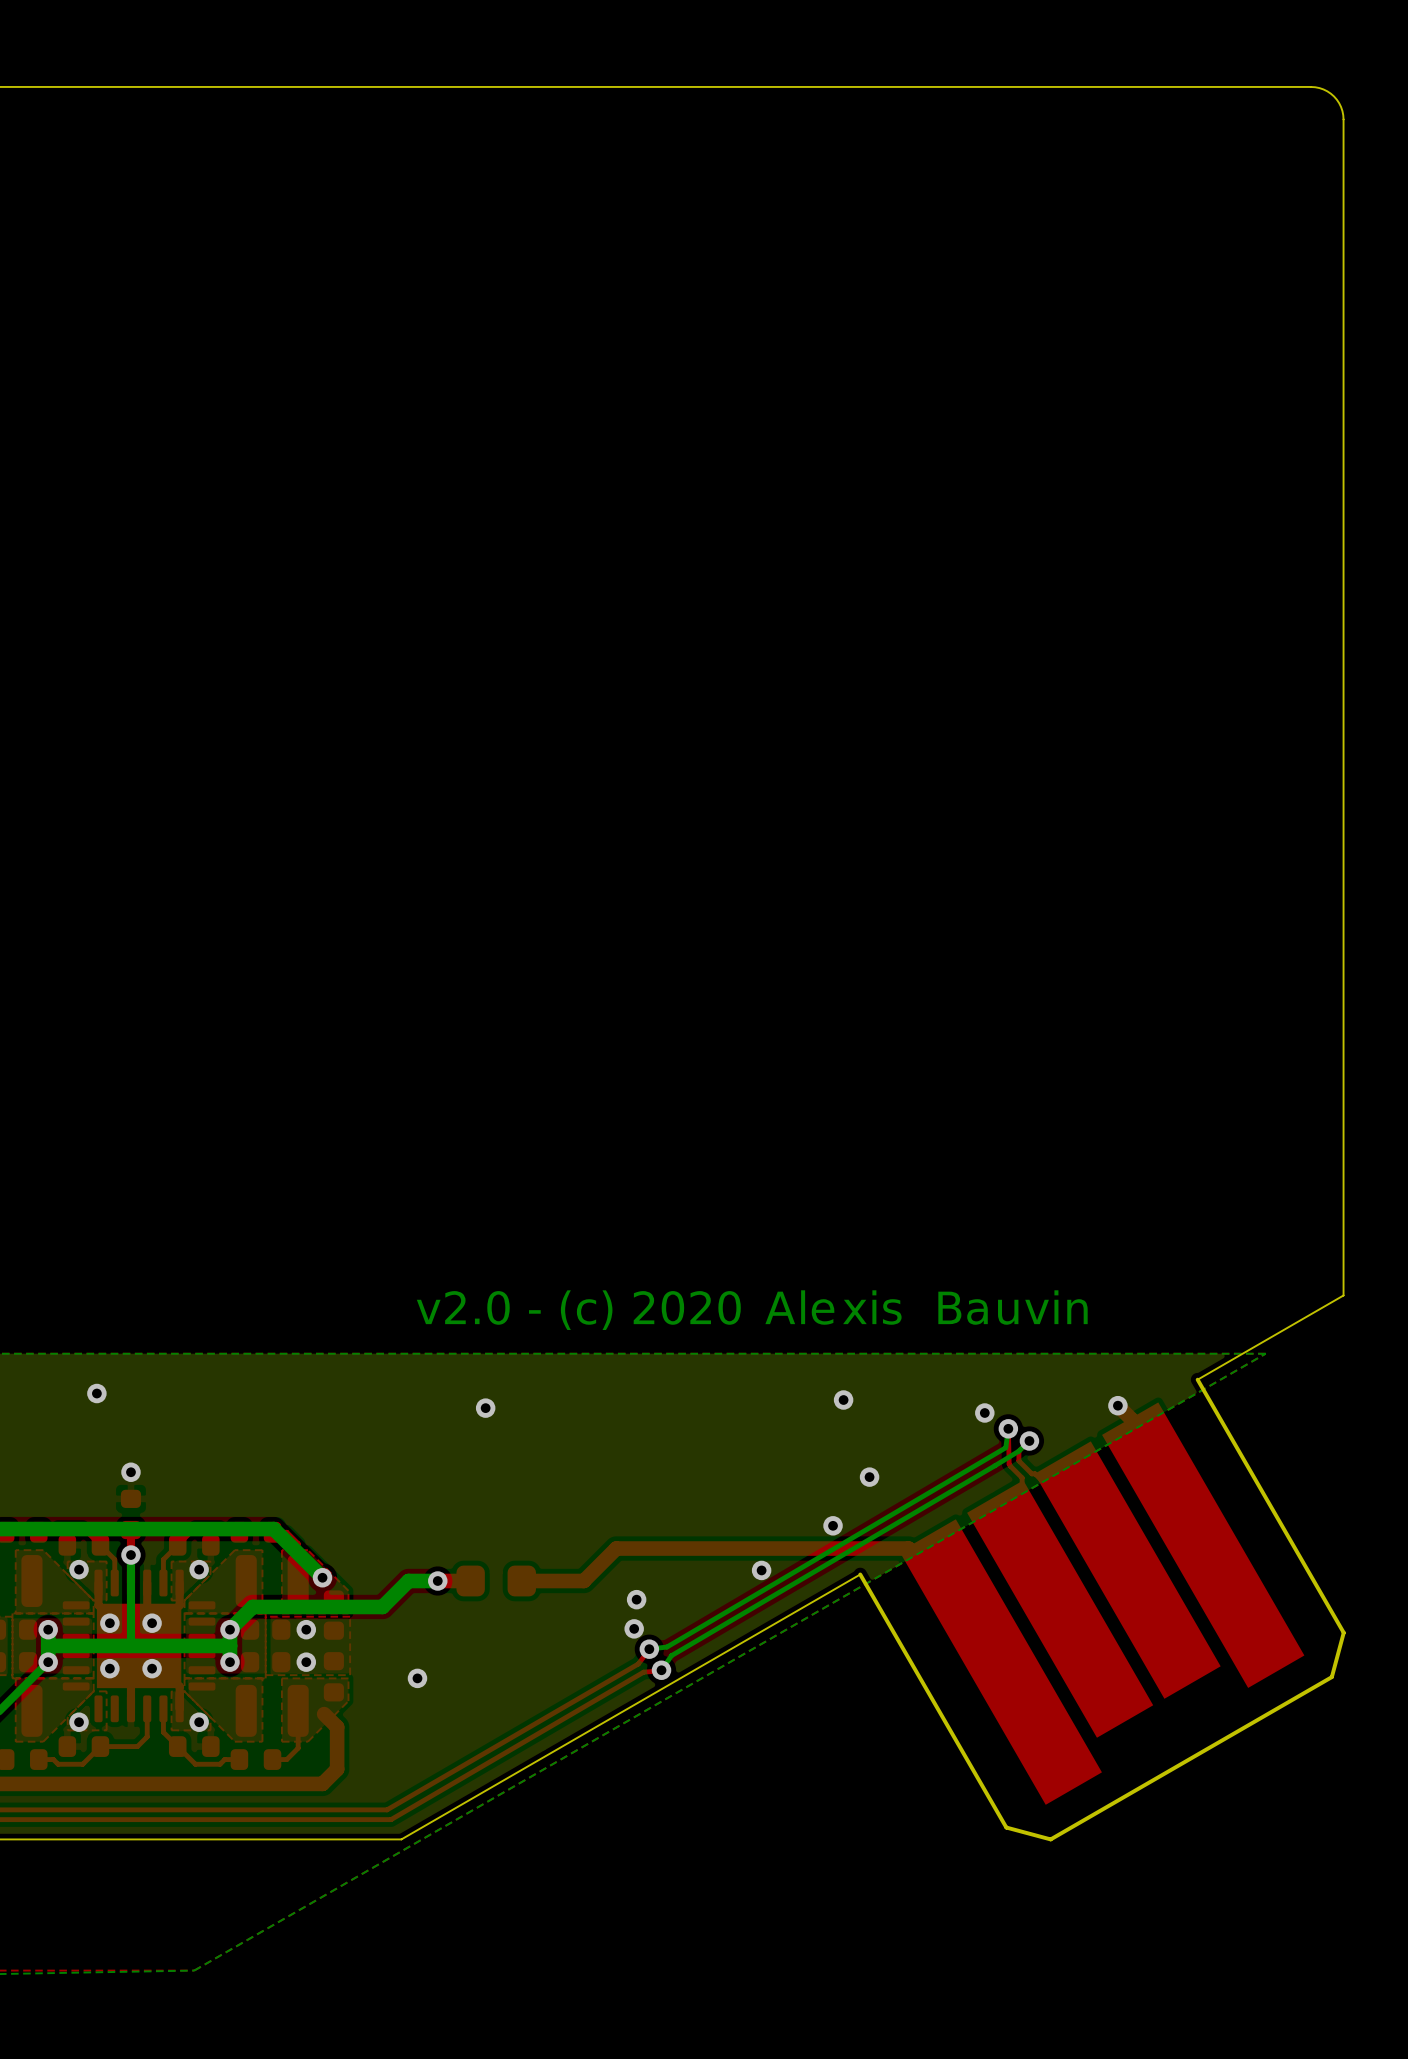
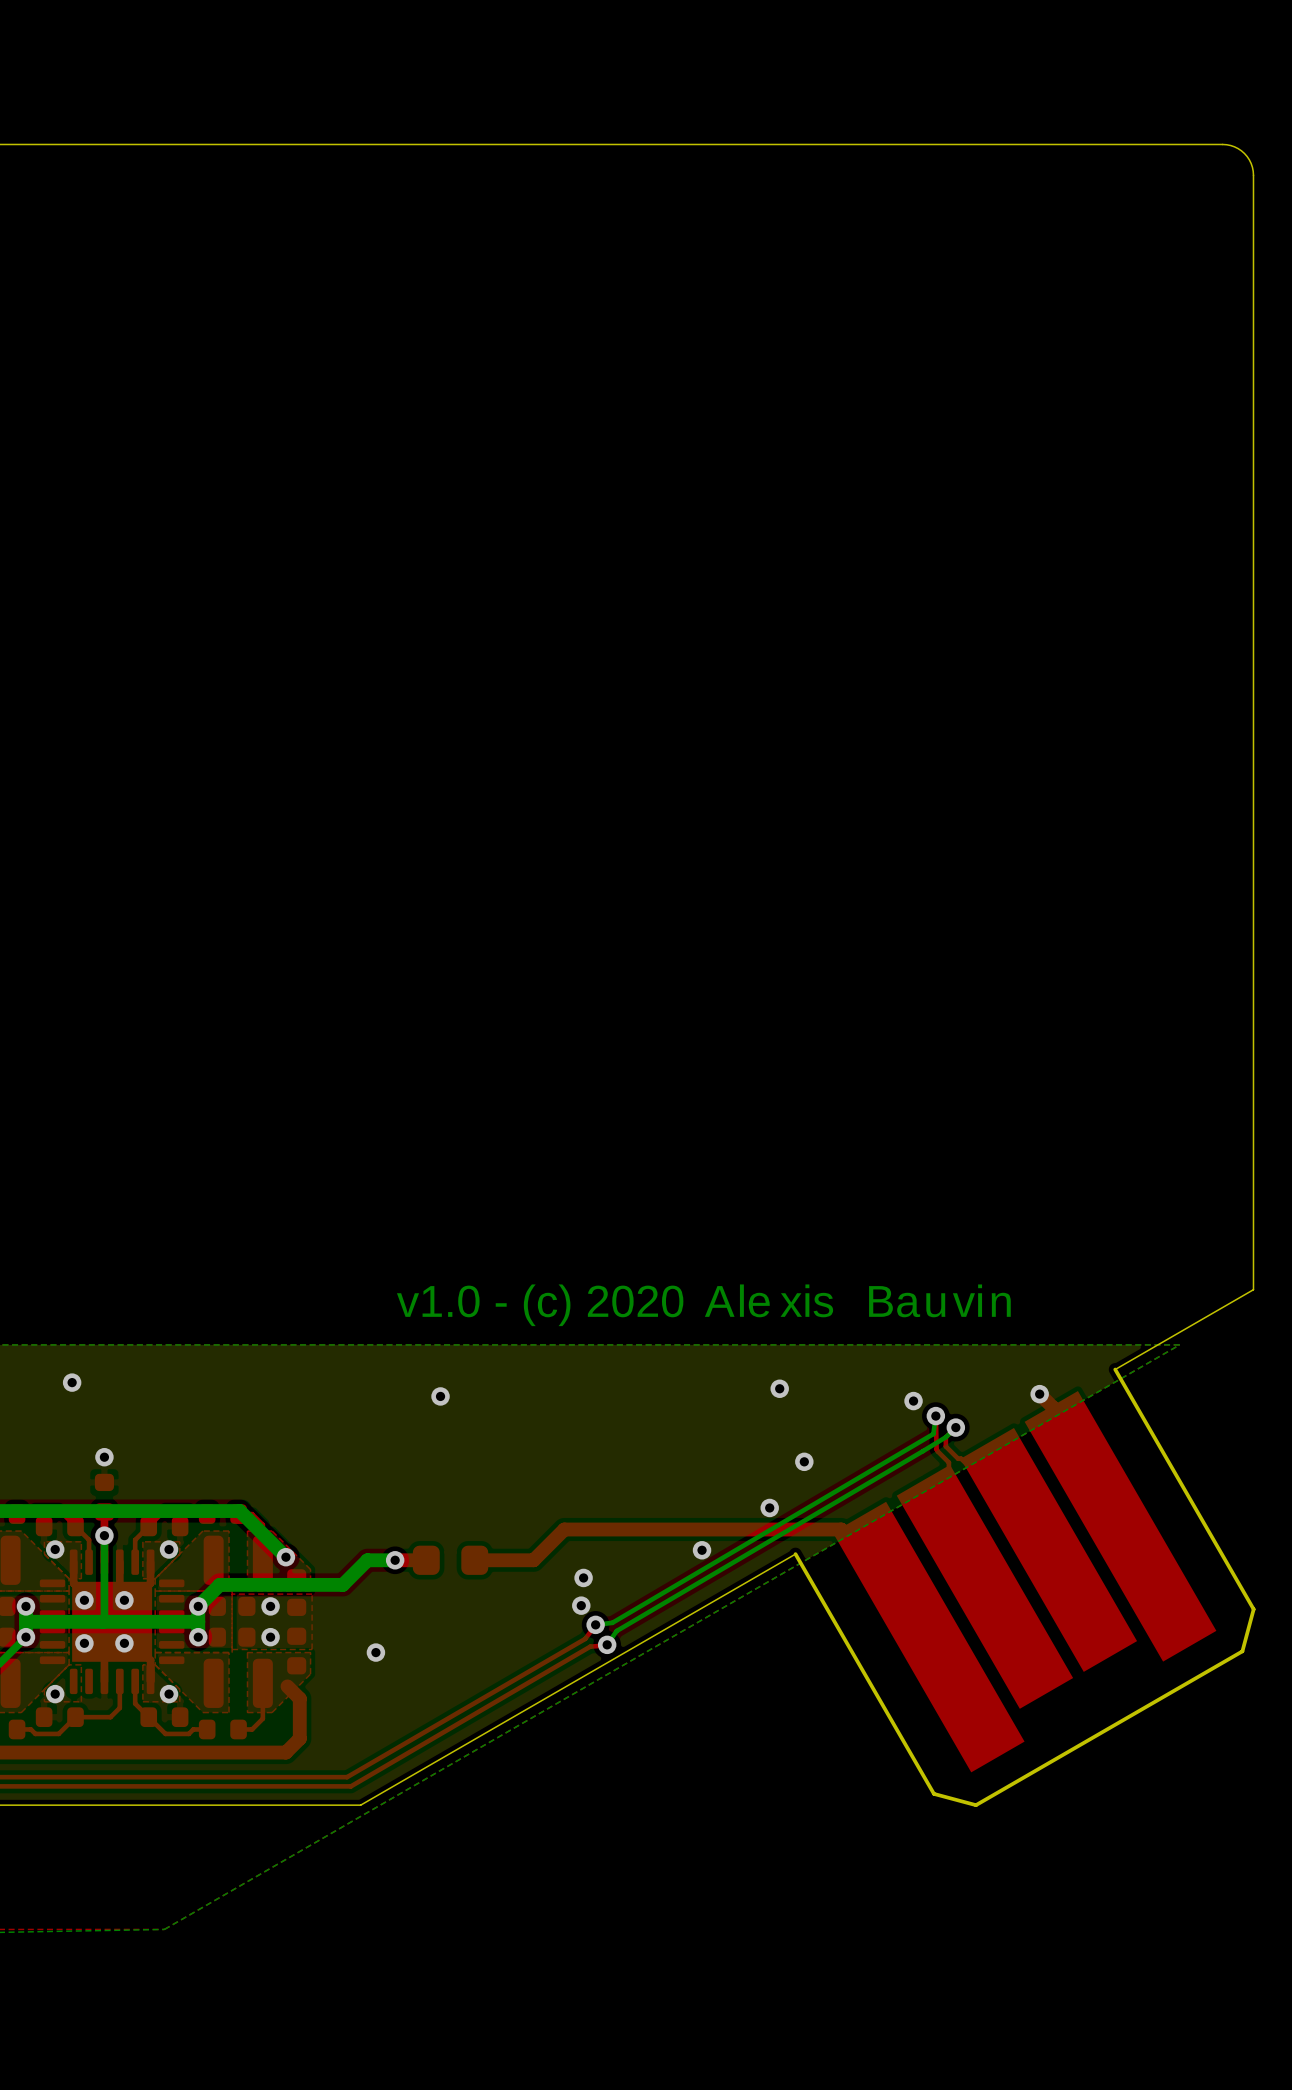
text: v2.0 - (c) 2020 (578, 1310) -> v1.0 - (c) 2020 (540, 1305)

